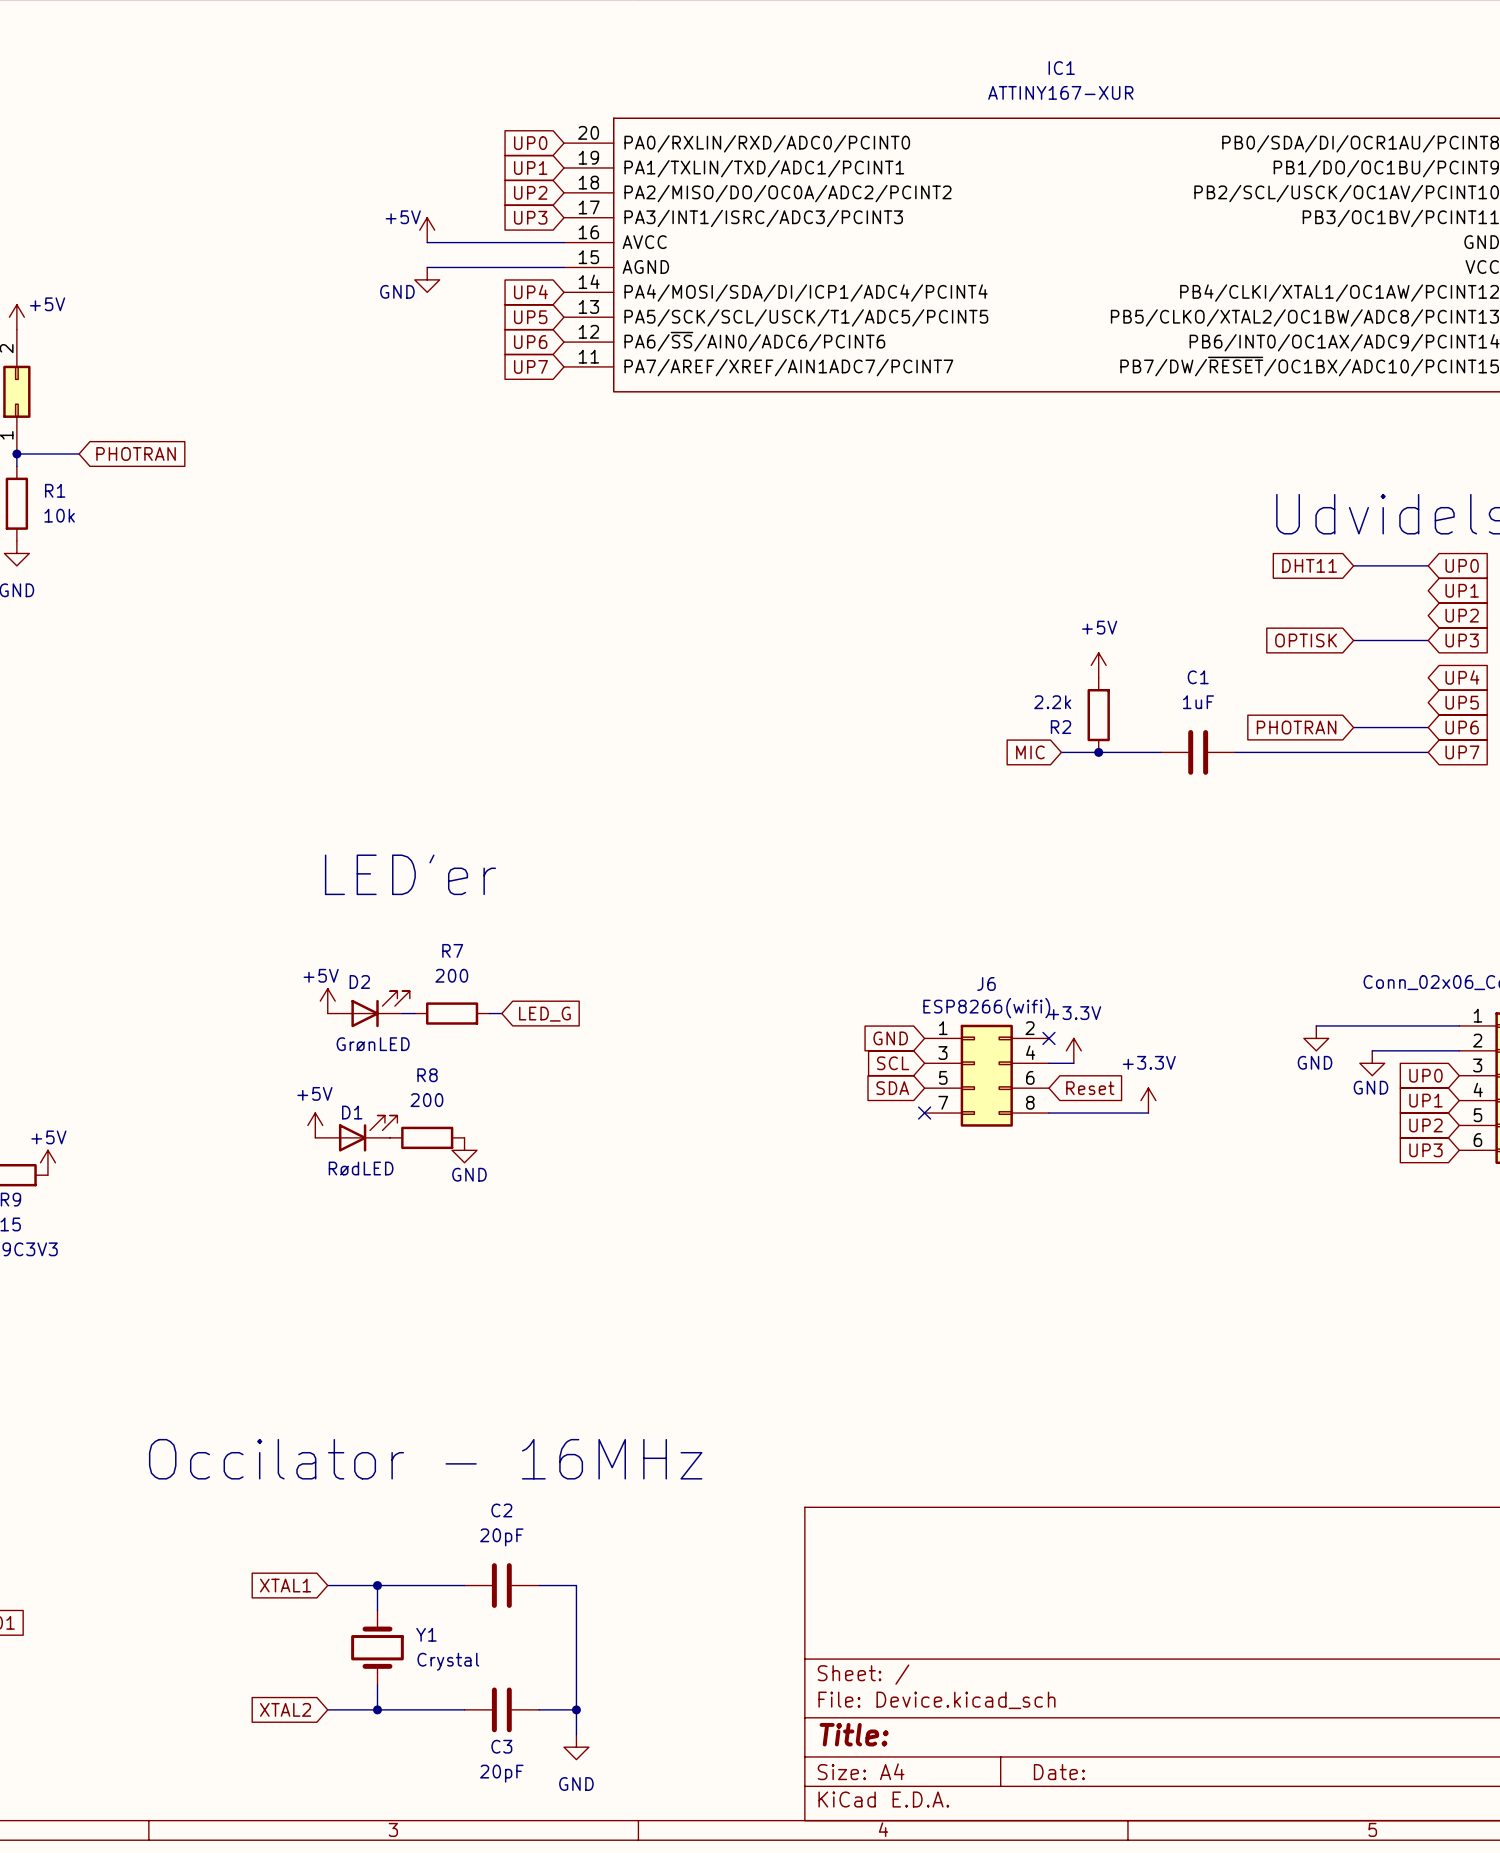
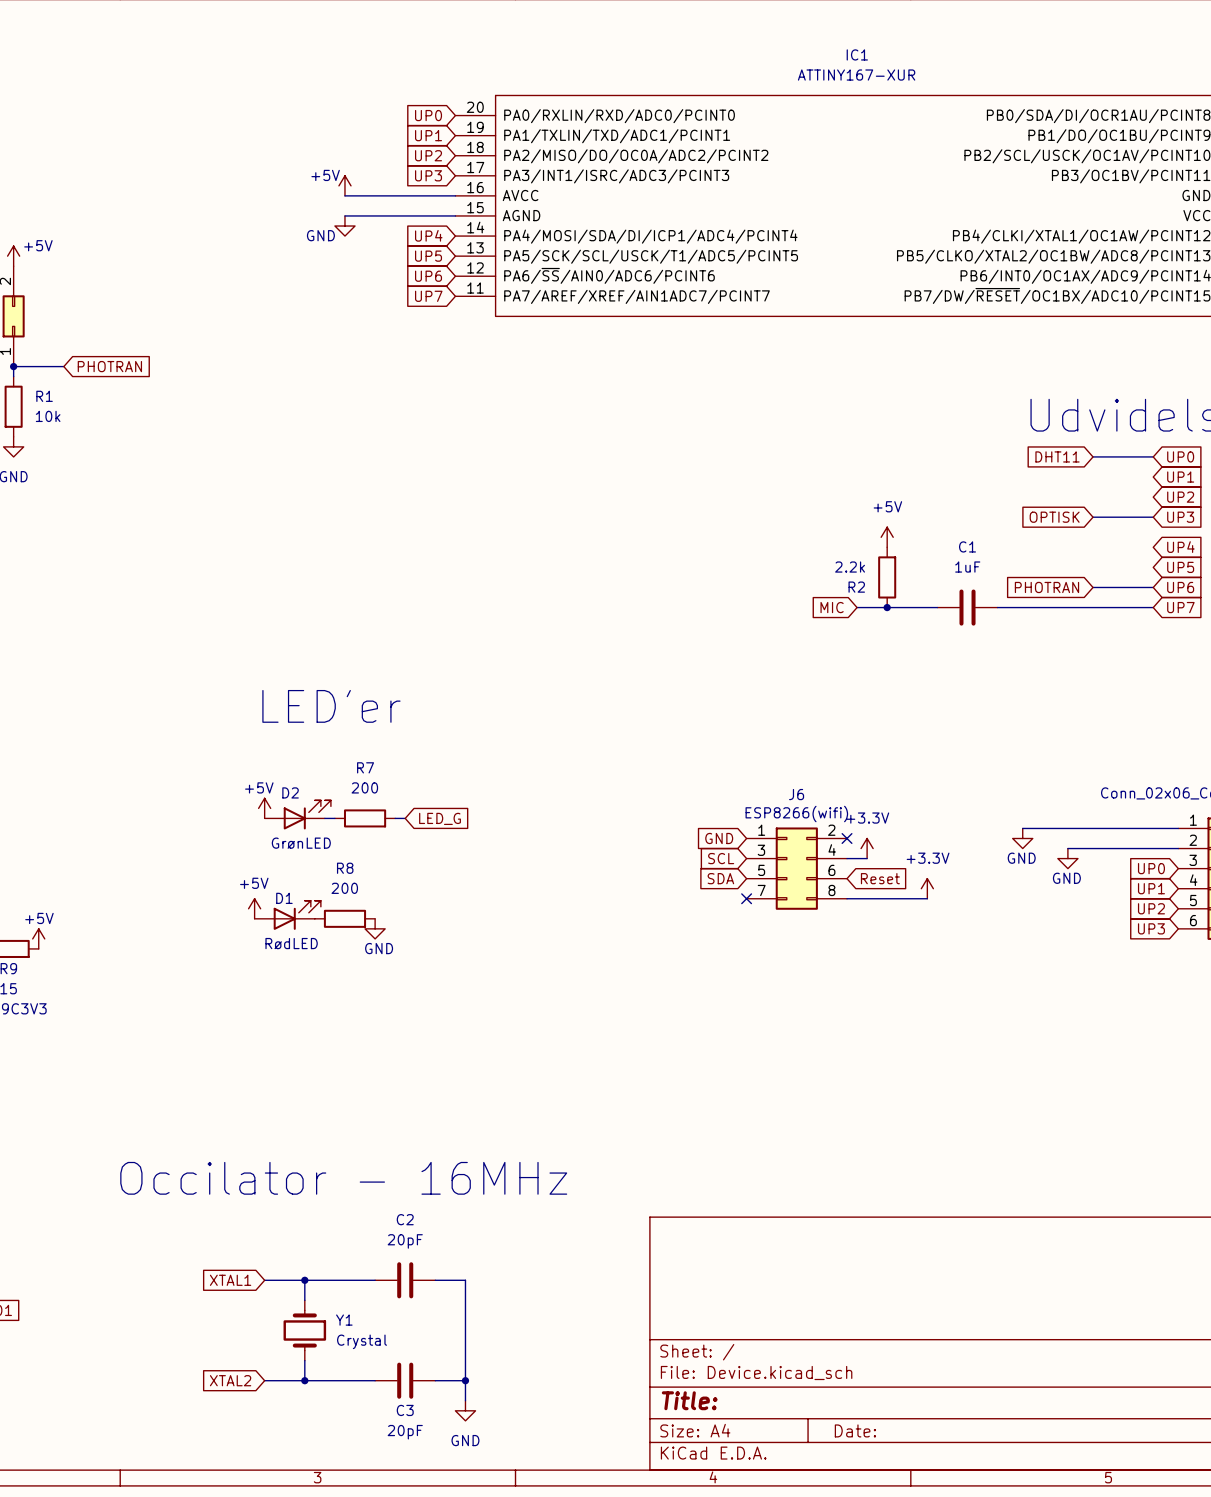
wire: none -> (1022, 828) (1062, 828)
power symbol: none -> GND (1022, 838)
power symbol: GND (1316, 1038) -> none
wire: none -> (1067, 848) (1108, 848)
power symbol: none -> GND (1067, 858)
power symbol: GND (1372, 1063) -> none

